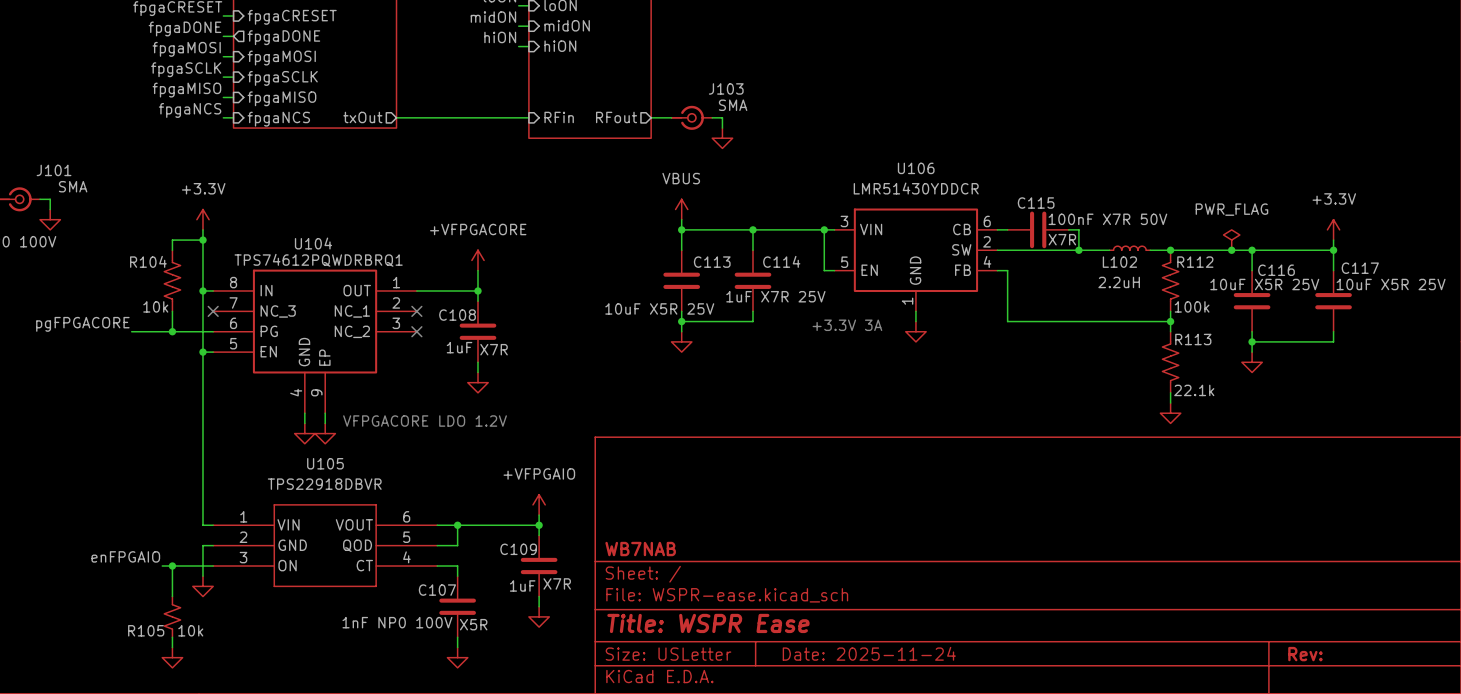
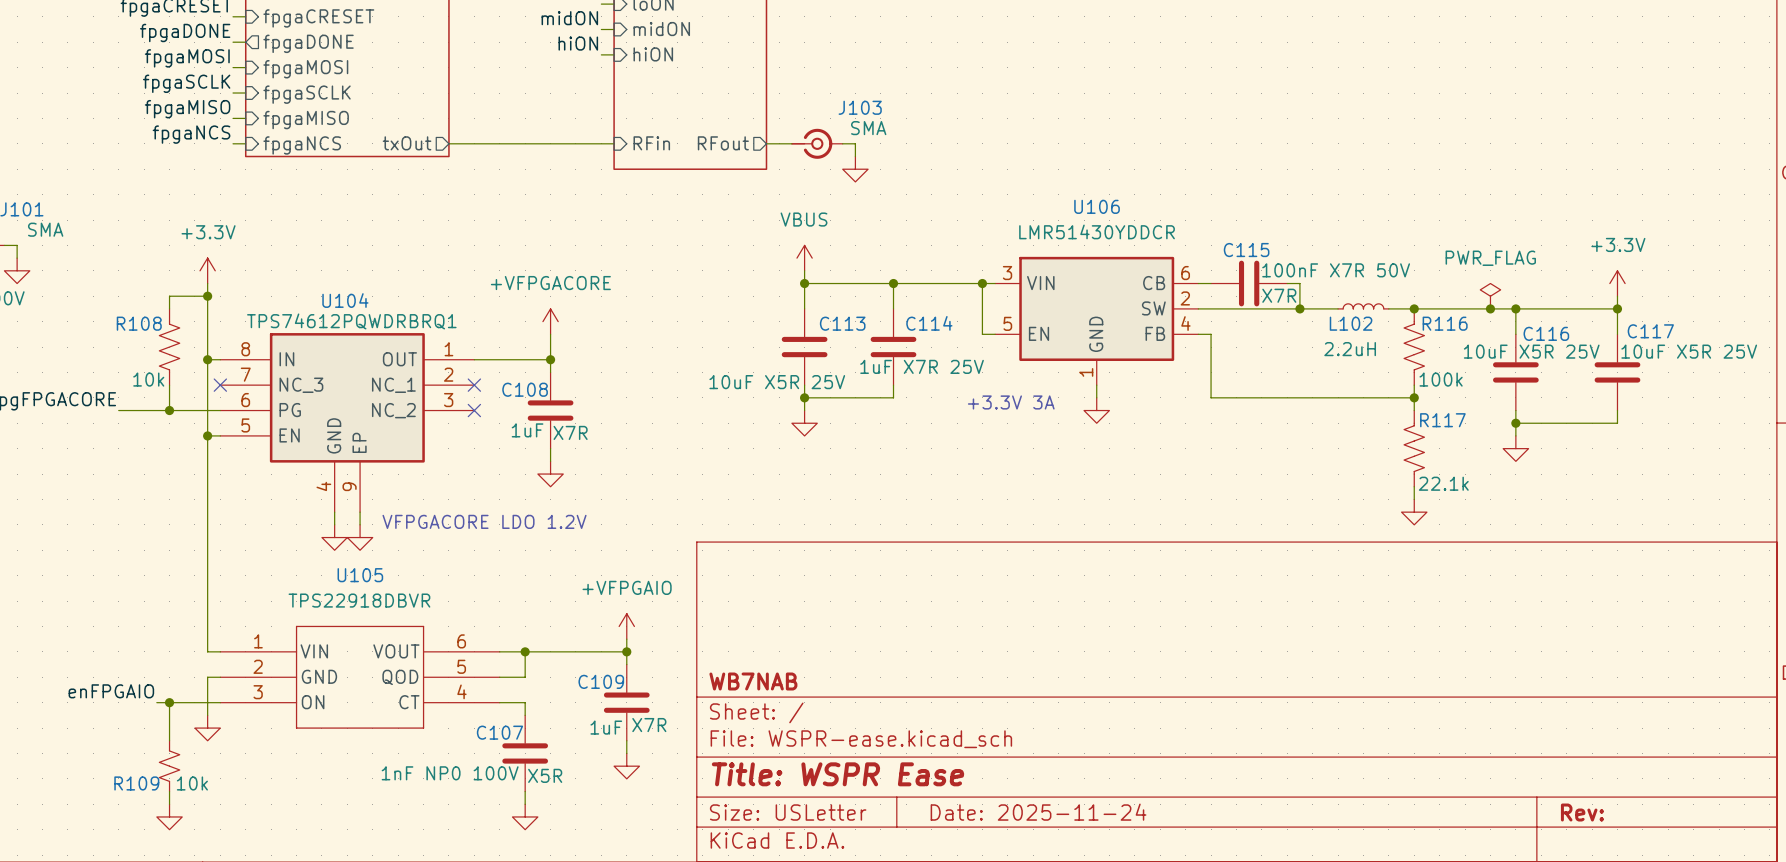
R104 name: R104 (148, 261) -> R108 (139, 323)
R112 name: R112 (1195, 262) -> R116 (1445, 323)
R113 name: R113 (1193, 339) -> R117 (1442, 420)
R105 name: R105 (146, 630) -> R109 (136, 783)

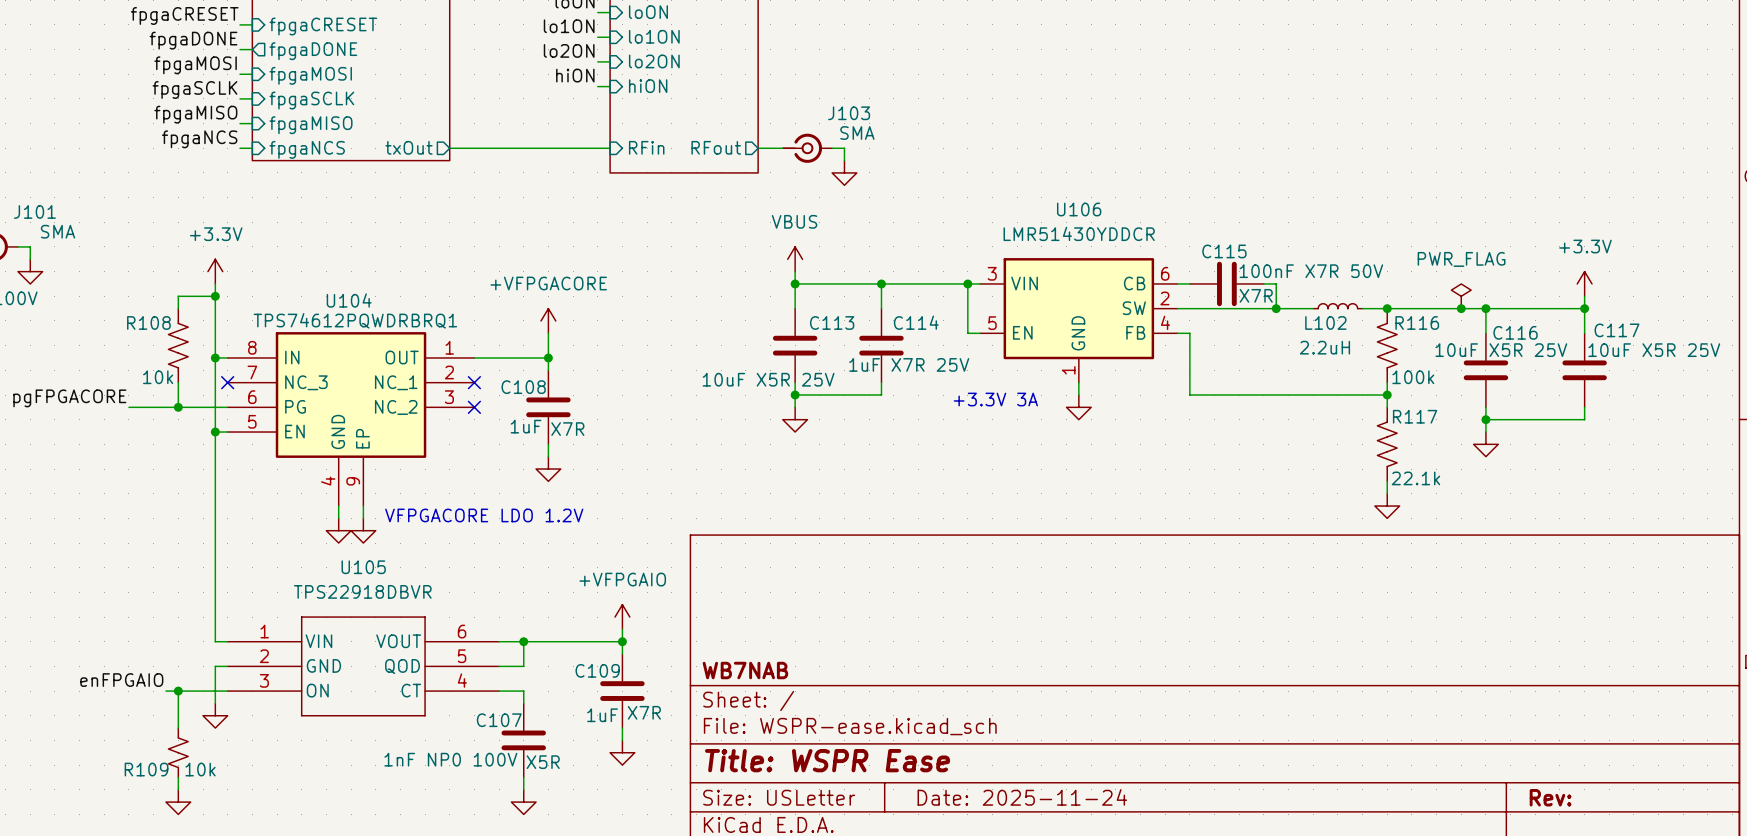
label: midON (569, 18) -> lo1ON (569, 26)
sheet pin: midON (661, 29) -> lo1ON (654, 36)
label: hiON (578, 43) -> lo2ON (569, 50)
sheet pin: hiON (653, 54) -> lo2ON (654, 61)
label: none -> hiON (575, 75)
sheet pin: none -> hiON (648, 86)
wire: none -> (597, 86) (610, 86)

